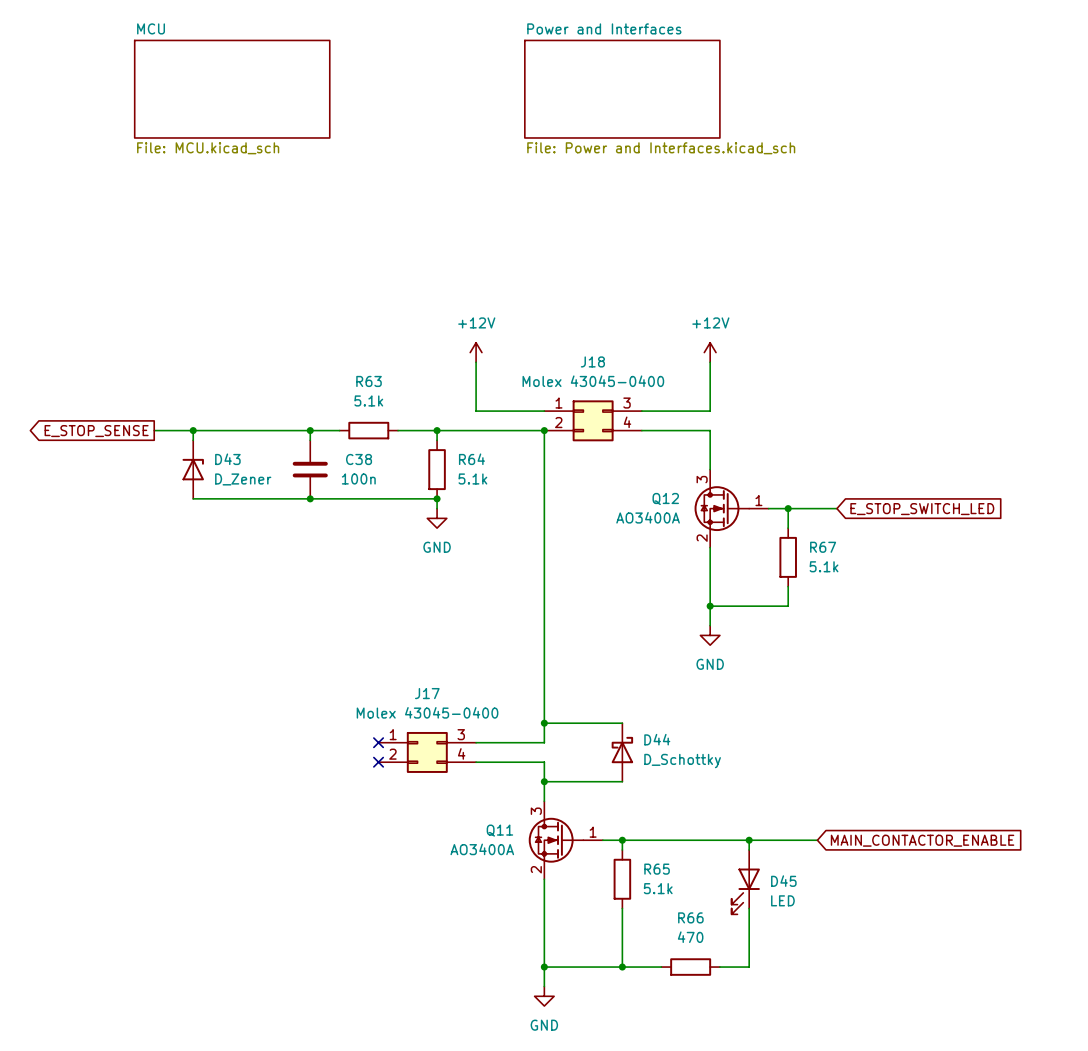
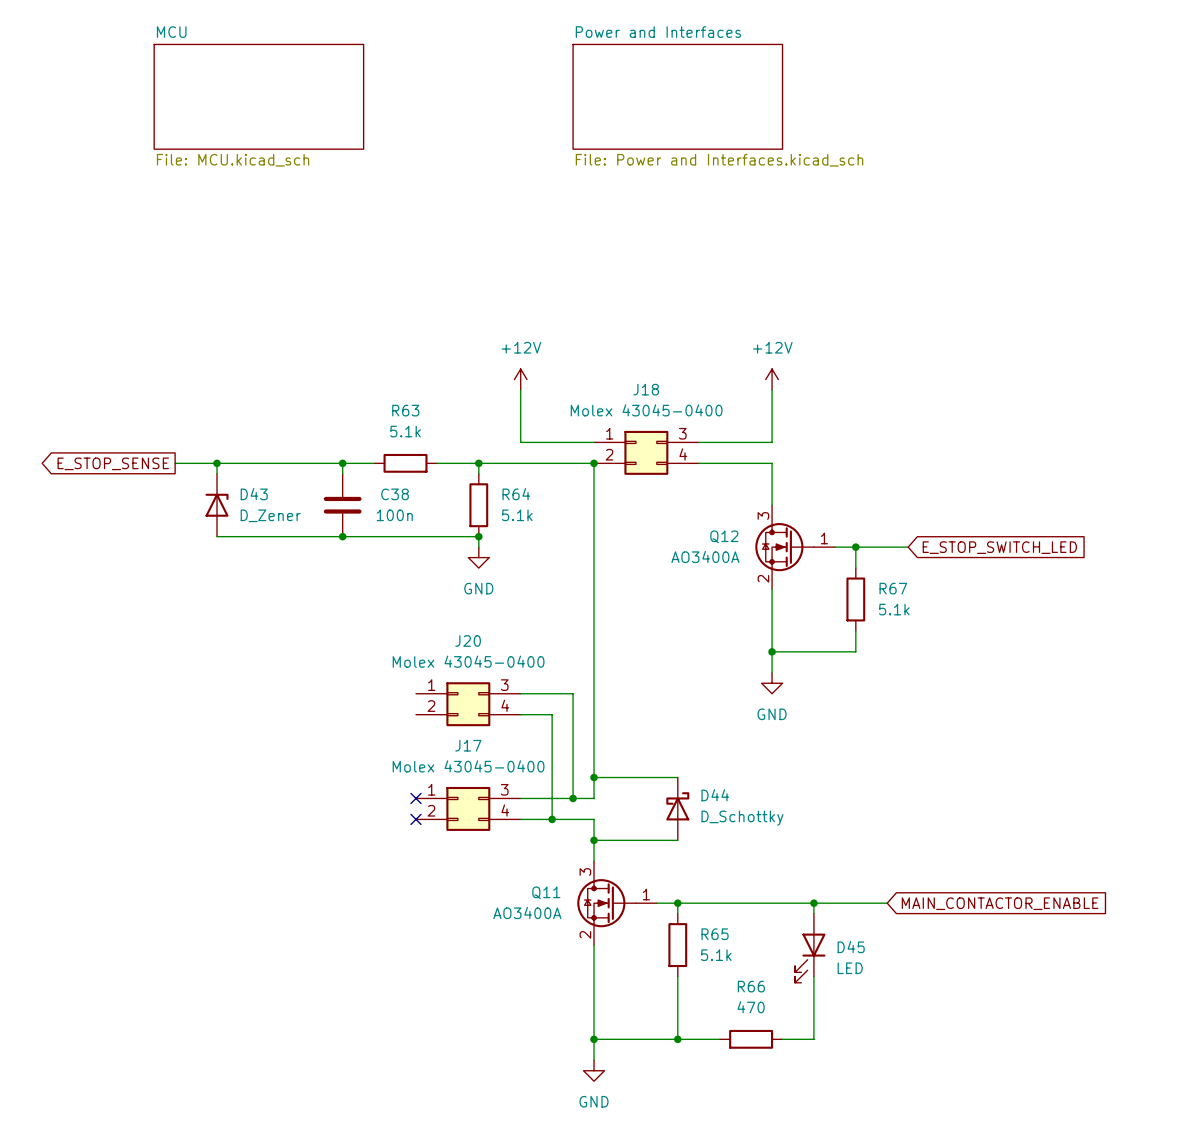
wire: none -> (520, 693) (573, 693) (573, 798)
J20: none -> Molex 43045-0400 (468, 704)
wire: none -> (520, 714) (552, 714) (552, 819)
junction: none -> (573, 798)
junction: none -> (552, 819)

